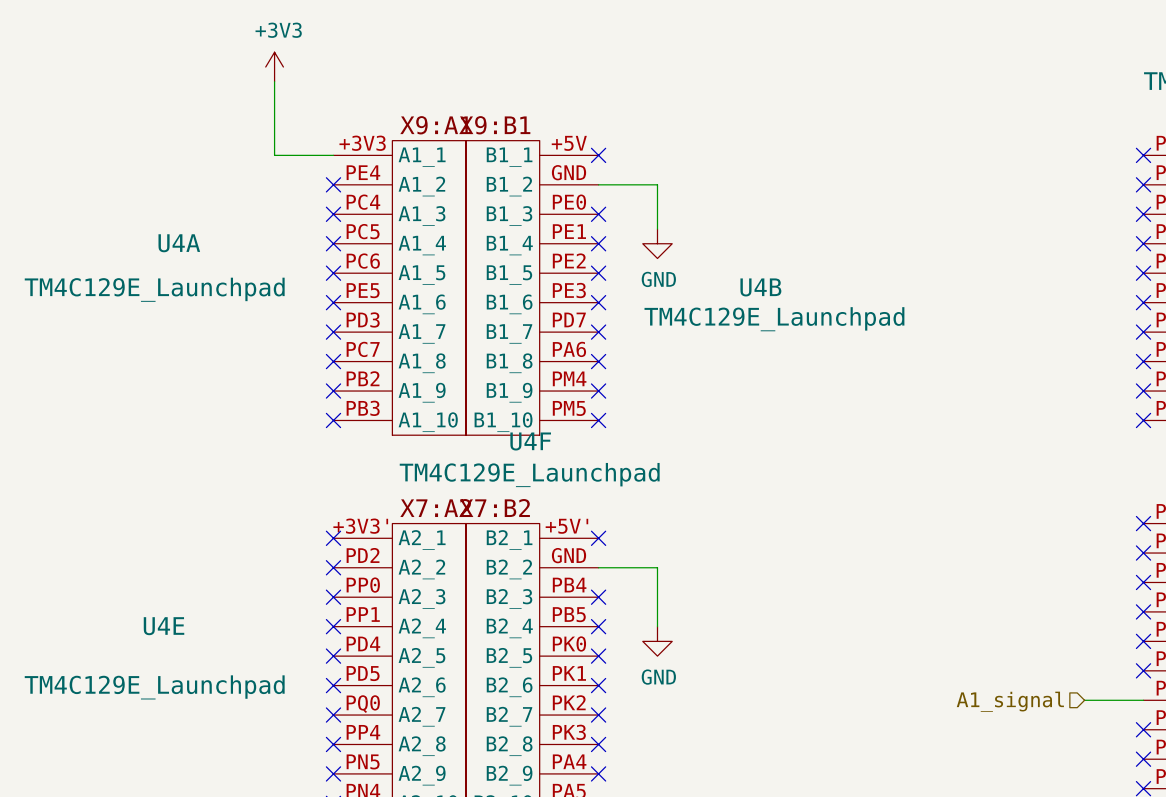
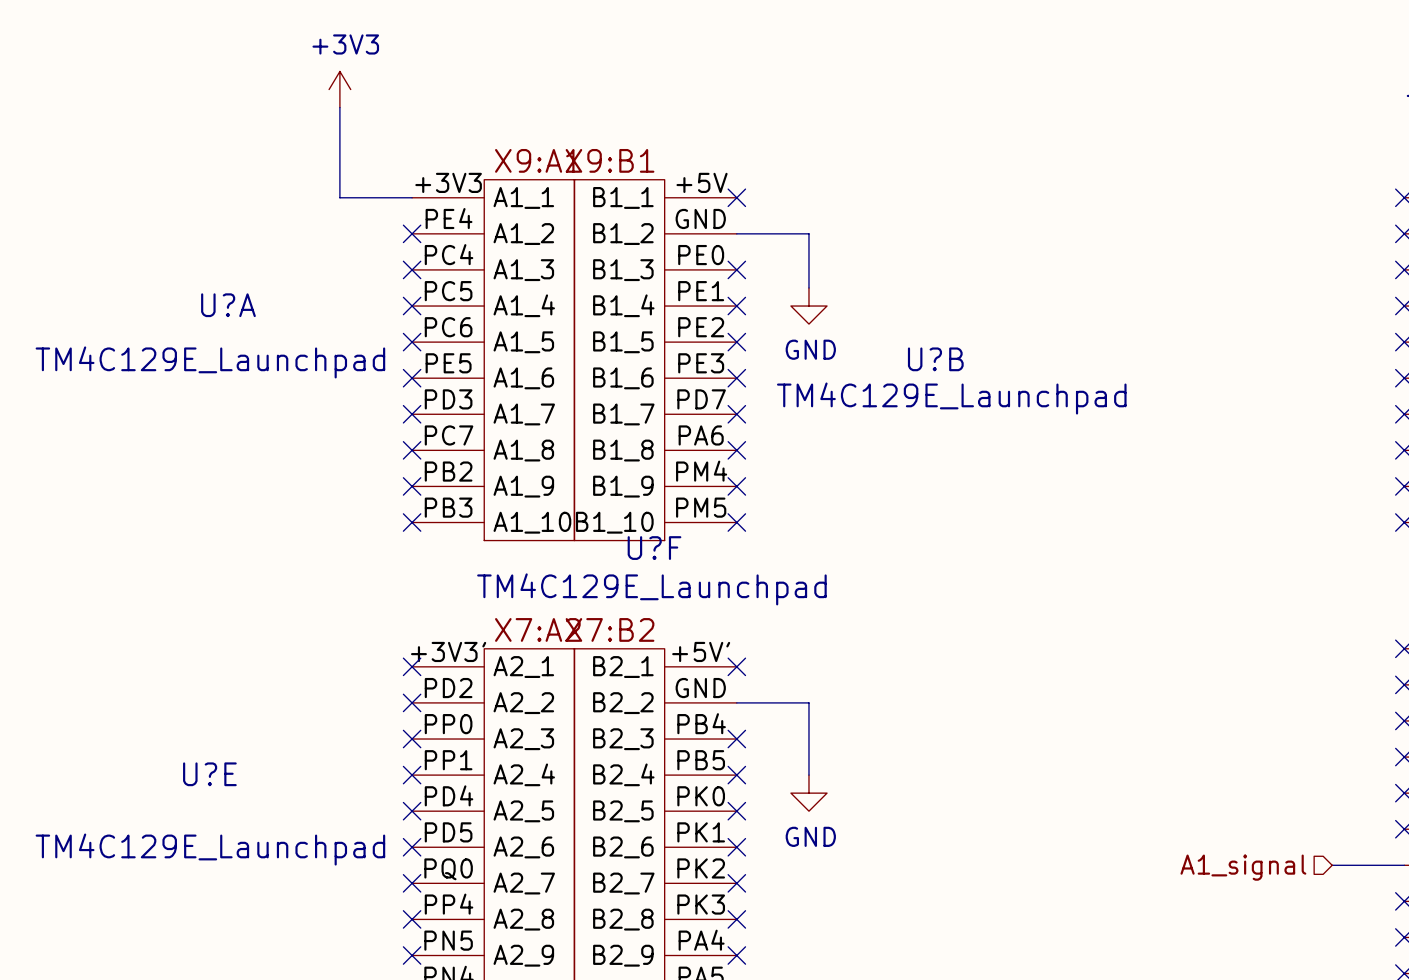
U4A name: U4A (179, 243) -> U?A (228, 305)
U4B name: U4B (760, 287) -> U?B (935, 359)
U4F name: U4F (530, 441) -> U?F (654, 548)
U4E name: U4E (164, 626) -> U?E (209, 774)

